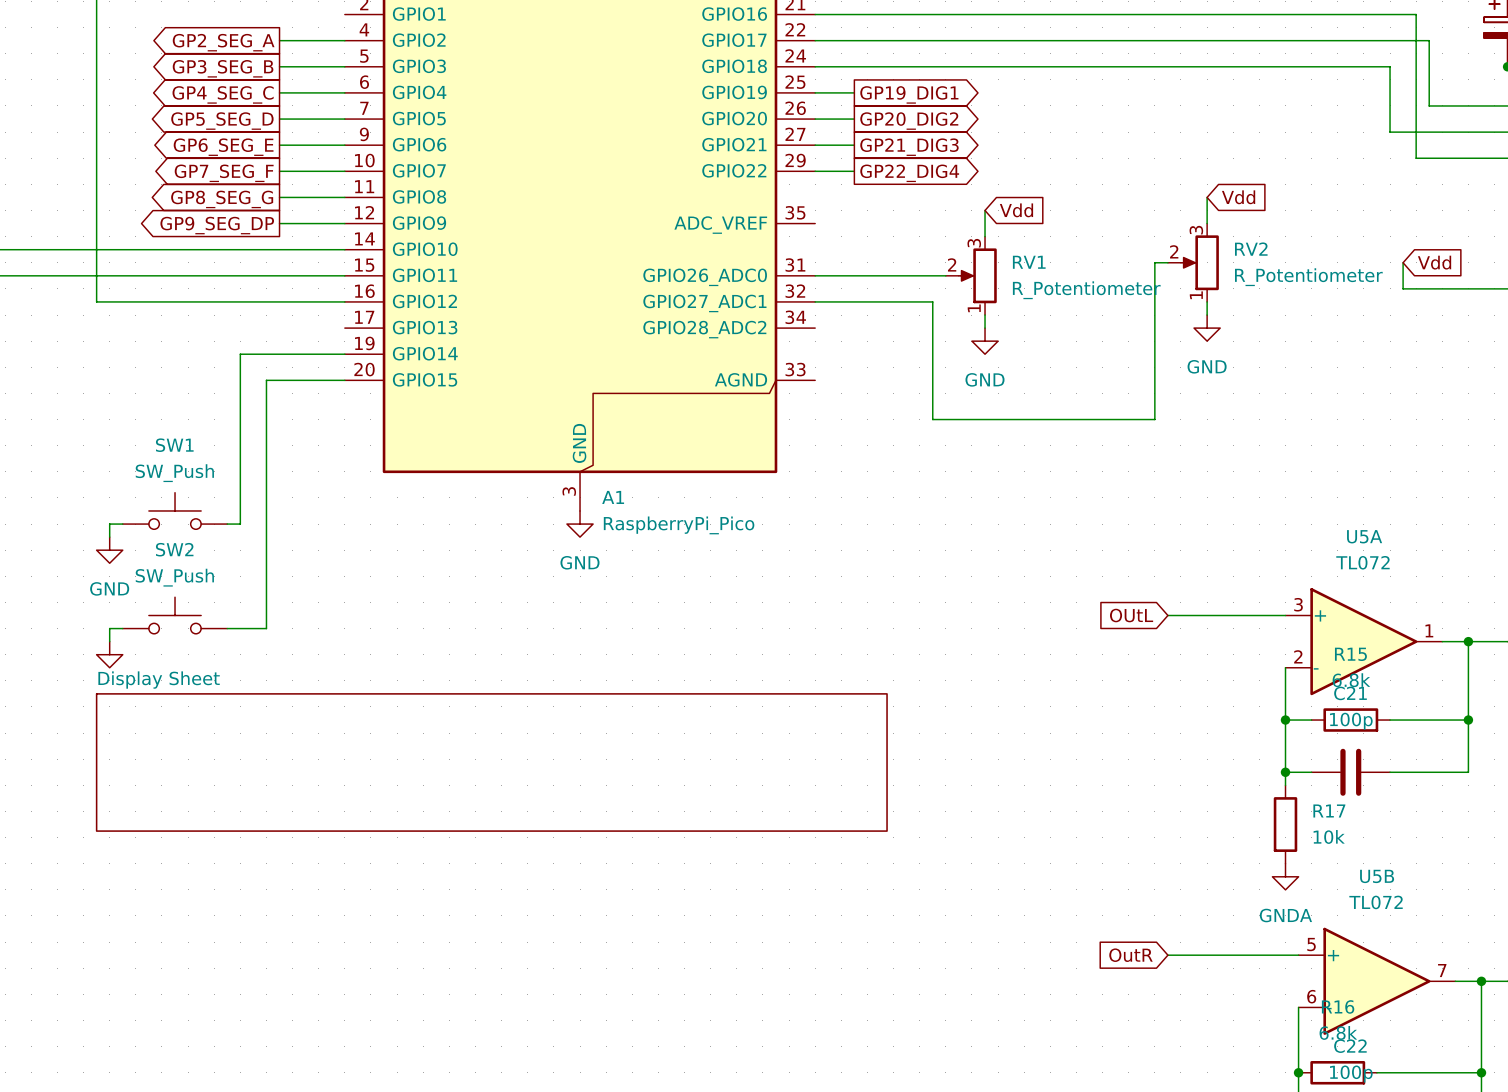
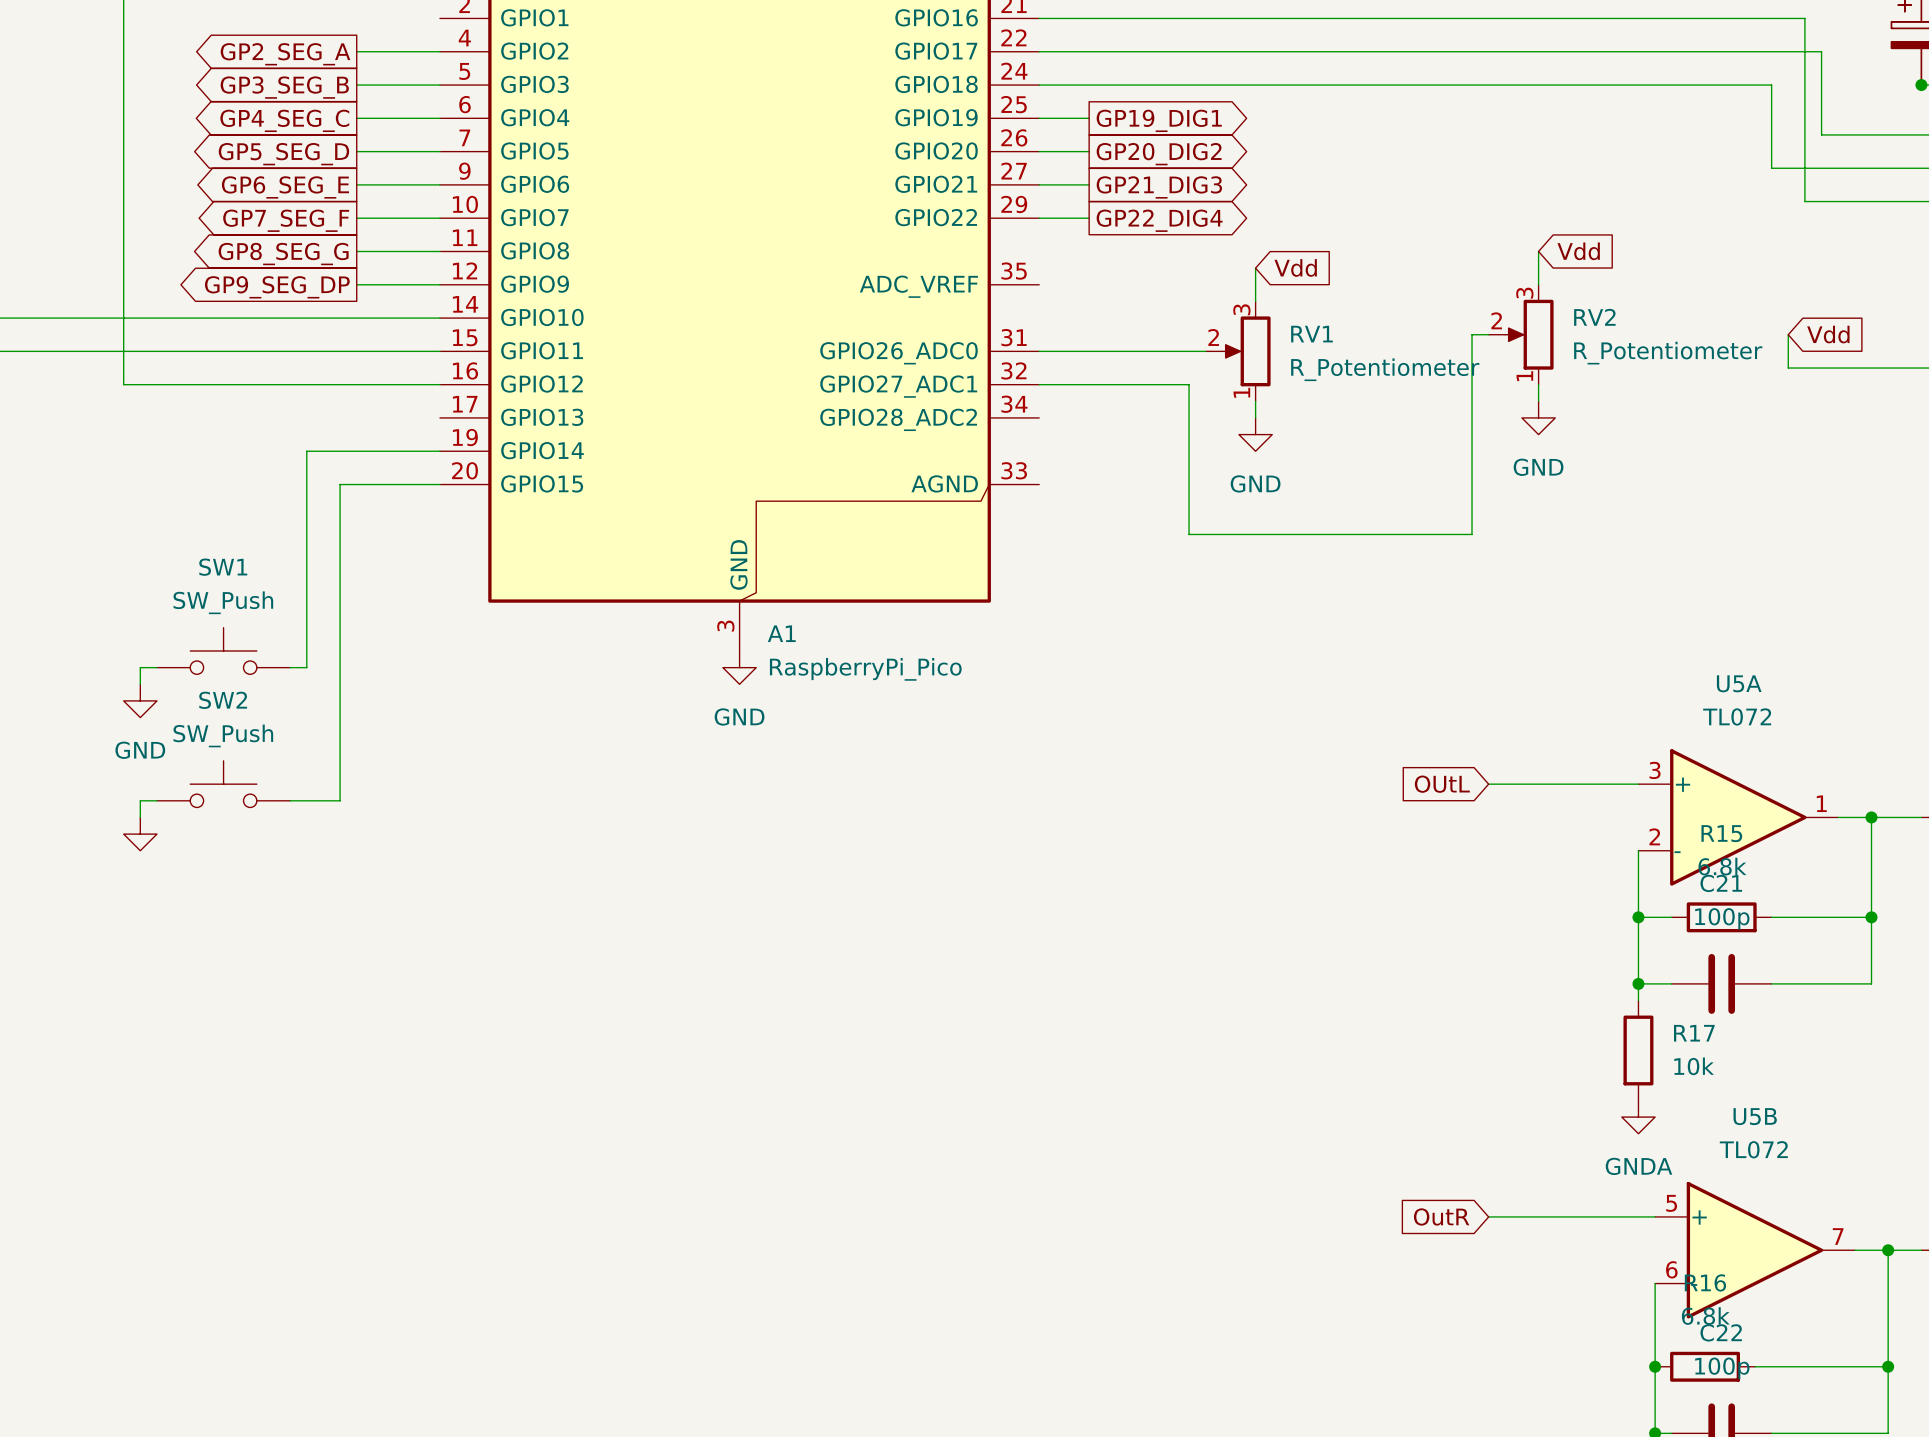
sheet Display Sheet: (491, 762) -> none

